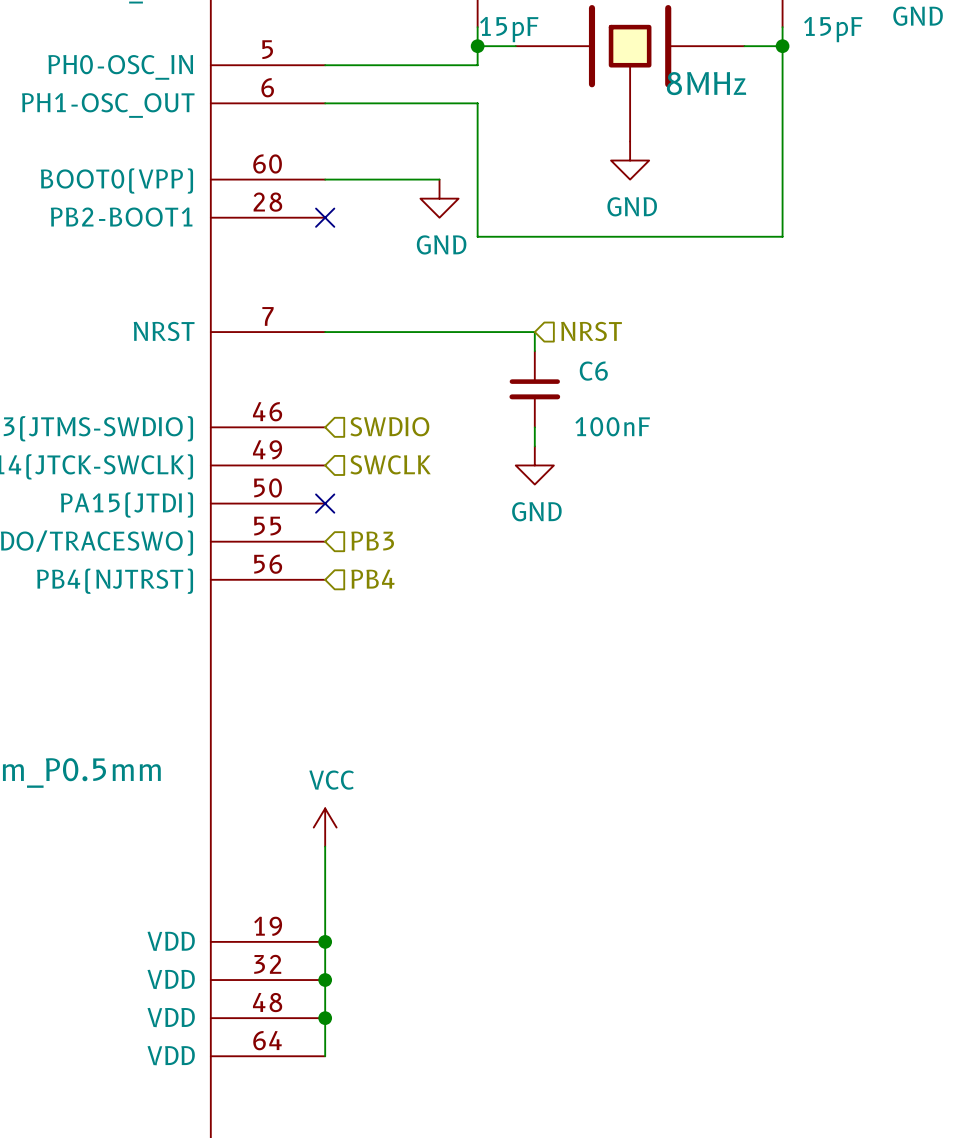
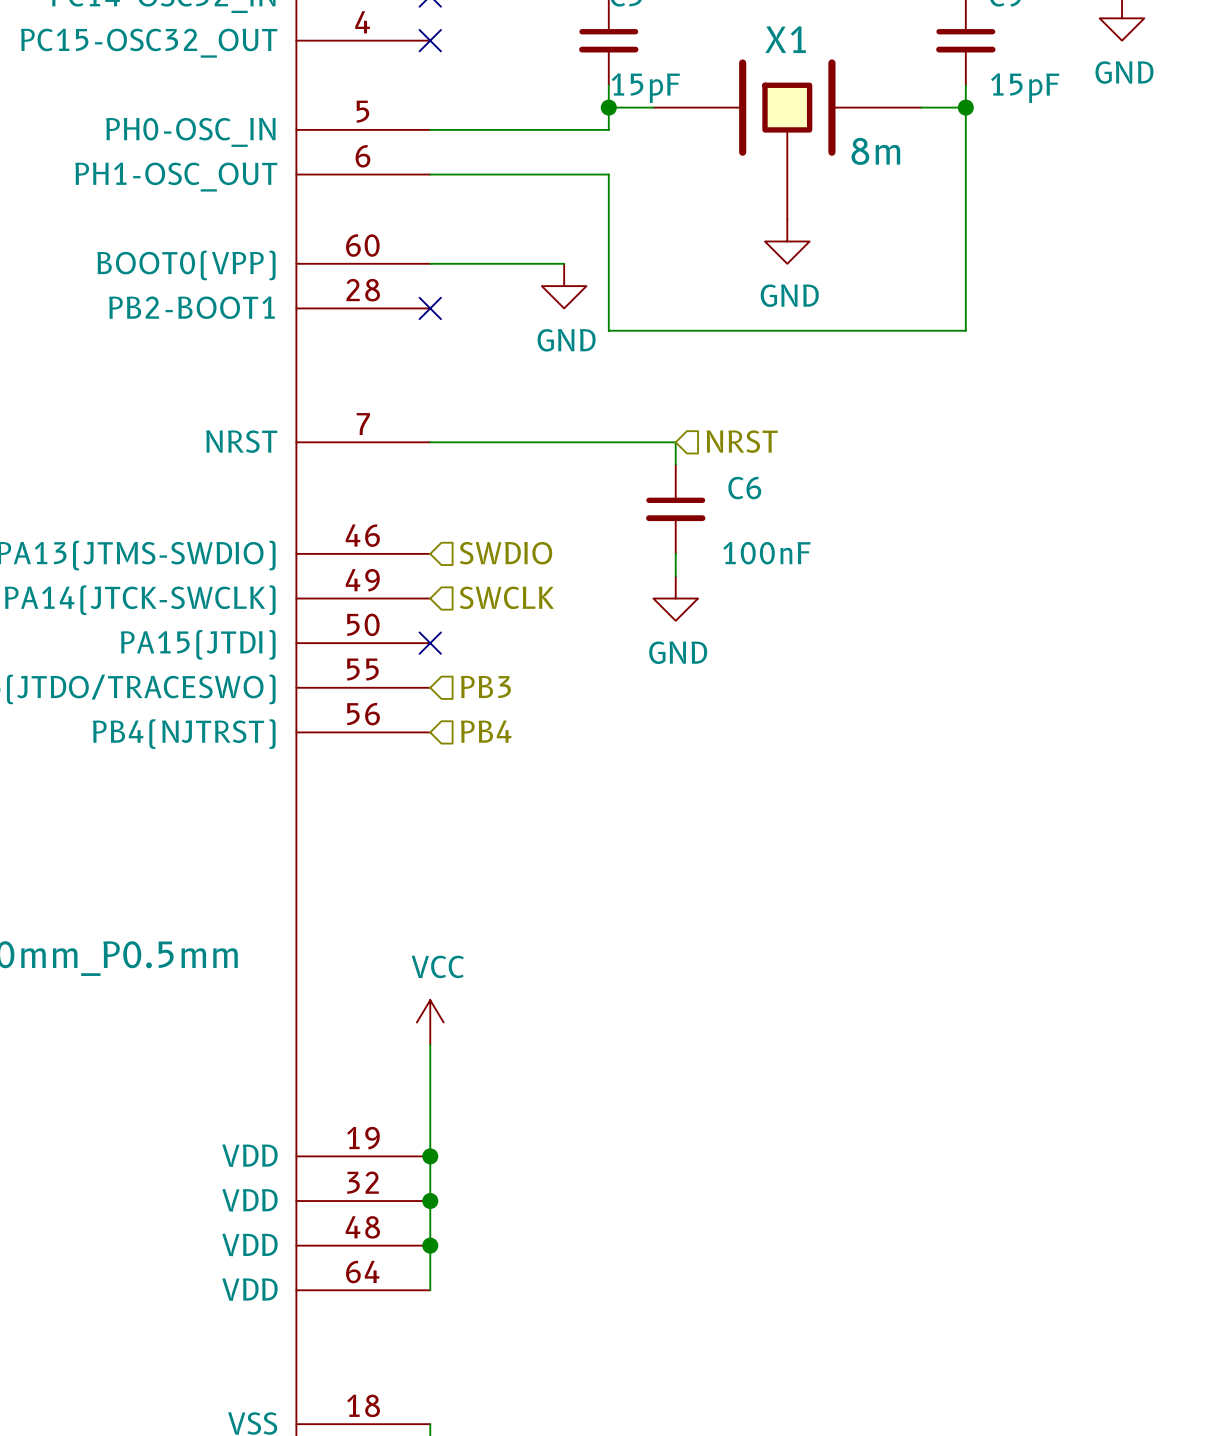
X1 value: 8MHz (706, 83) -> 8m (875, 151)

